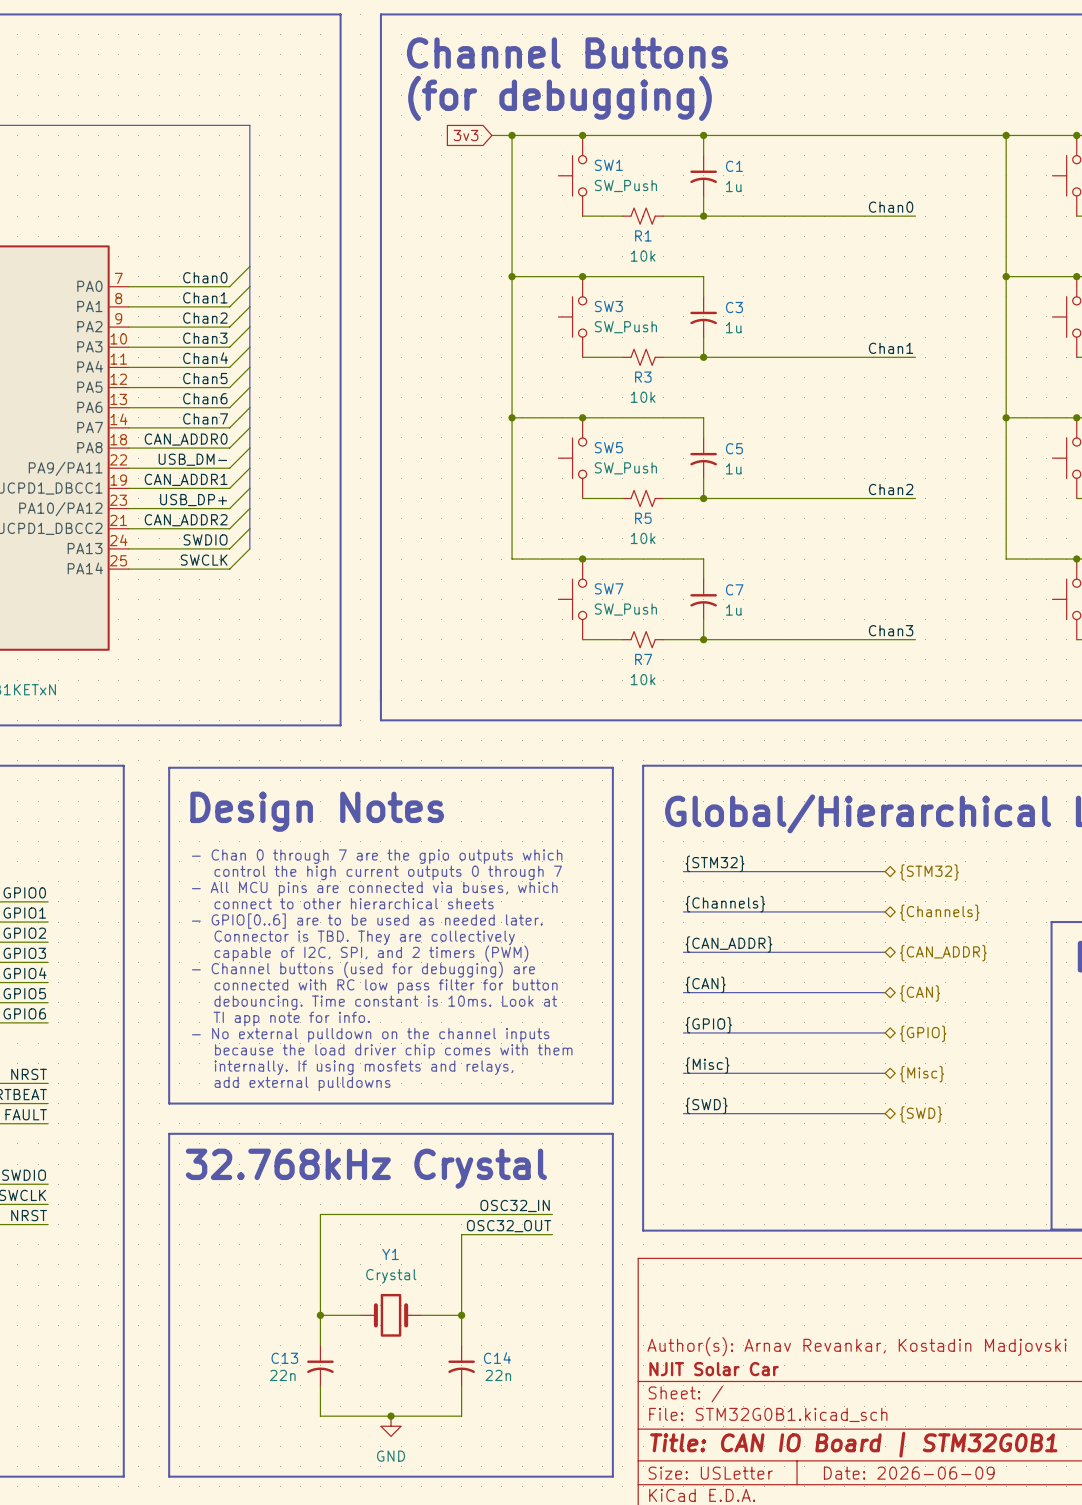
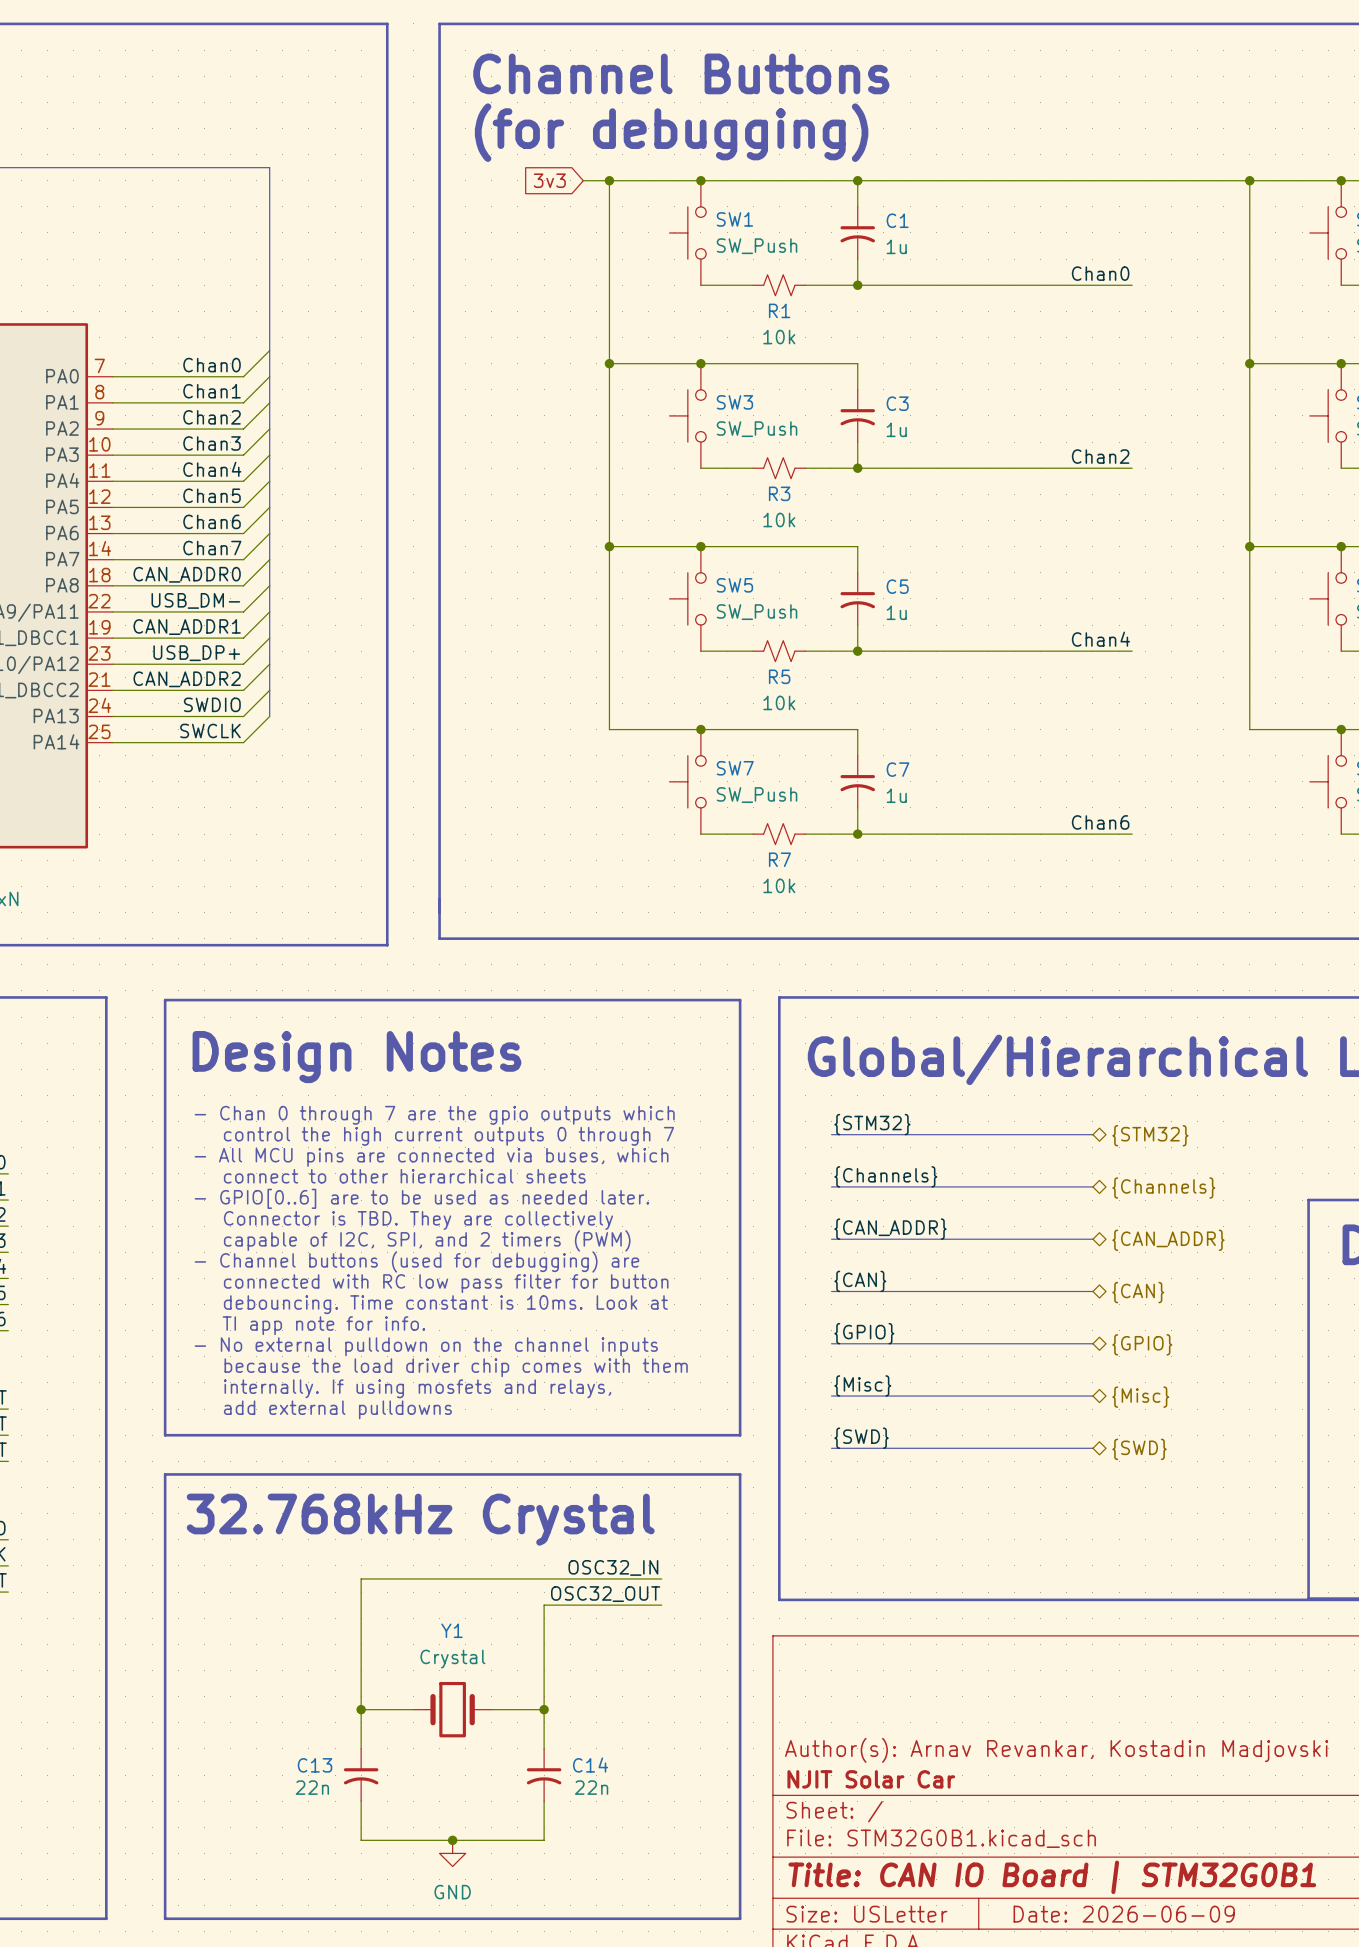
label: Chan1 (891, 348) -> Chan2 (1100, 456)
label: Chan2 (891, 489) -> Chan4 (1100, 639)
label: Chan3 (891, 630) -> Chan6 (1100, 822)

